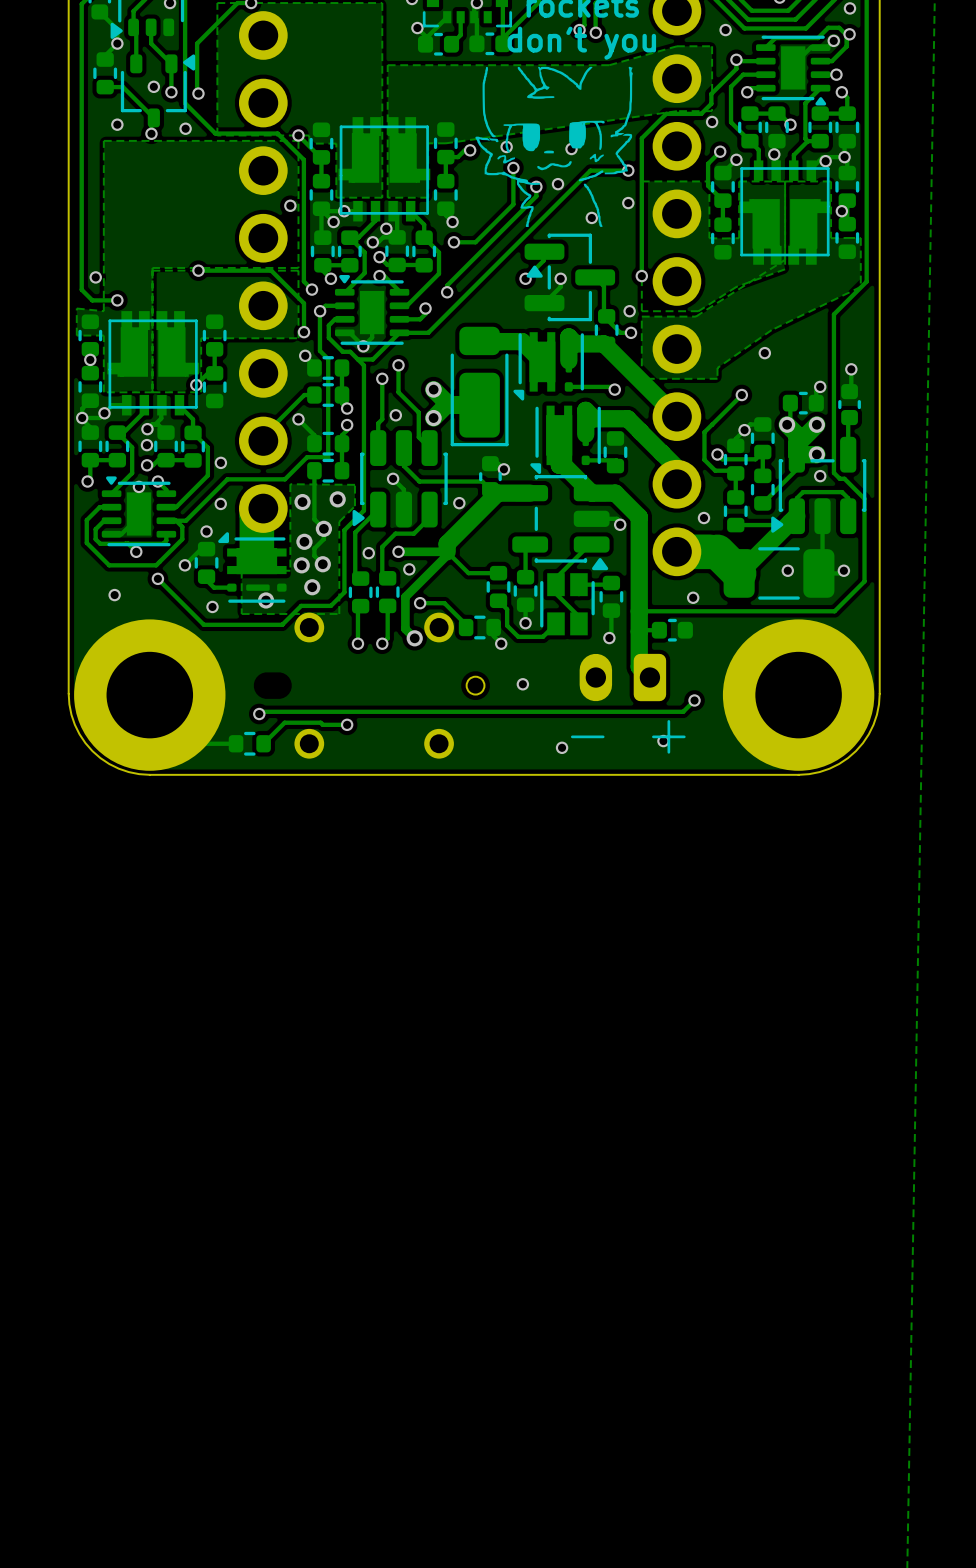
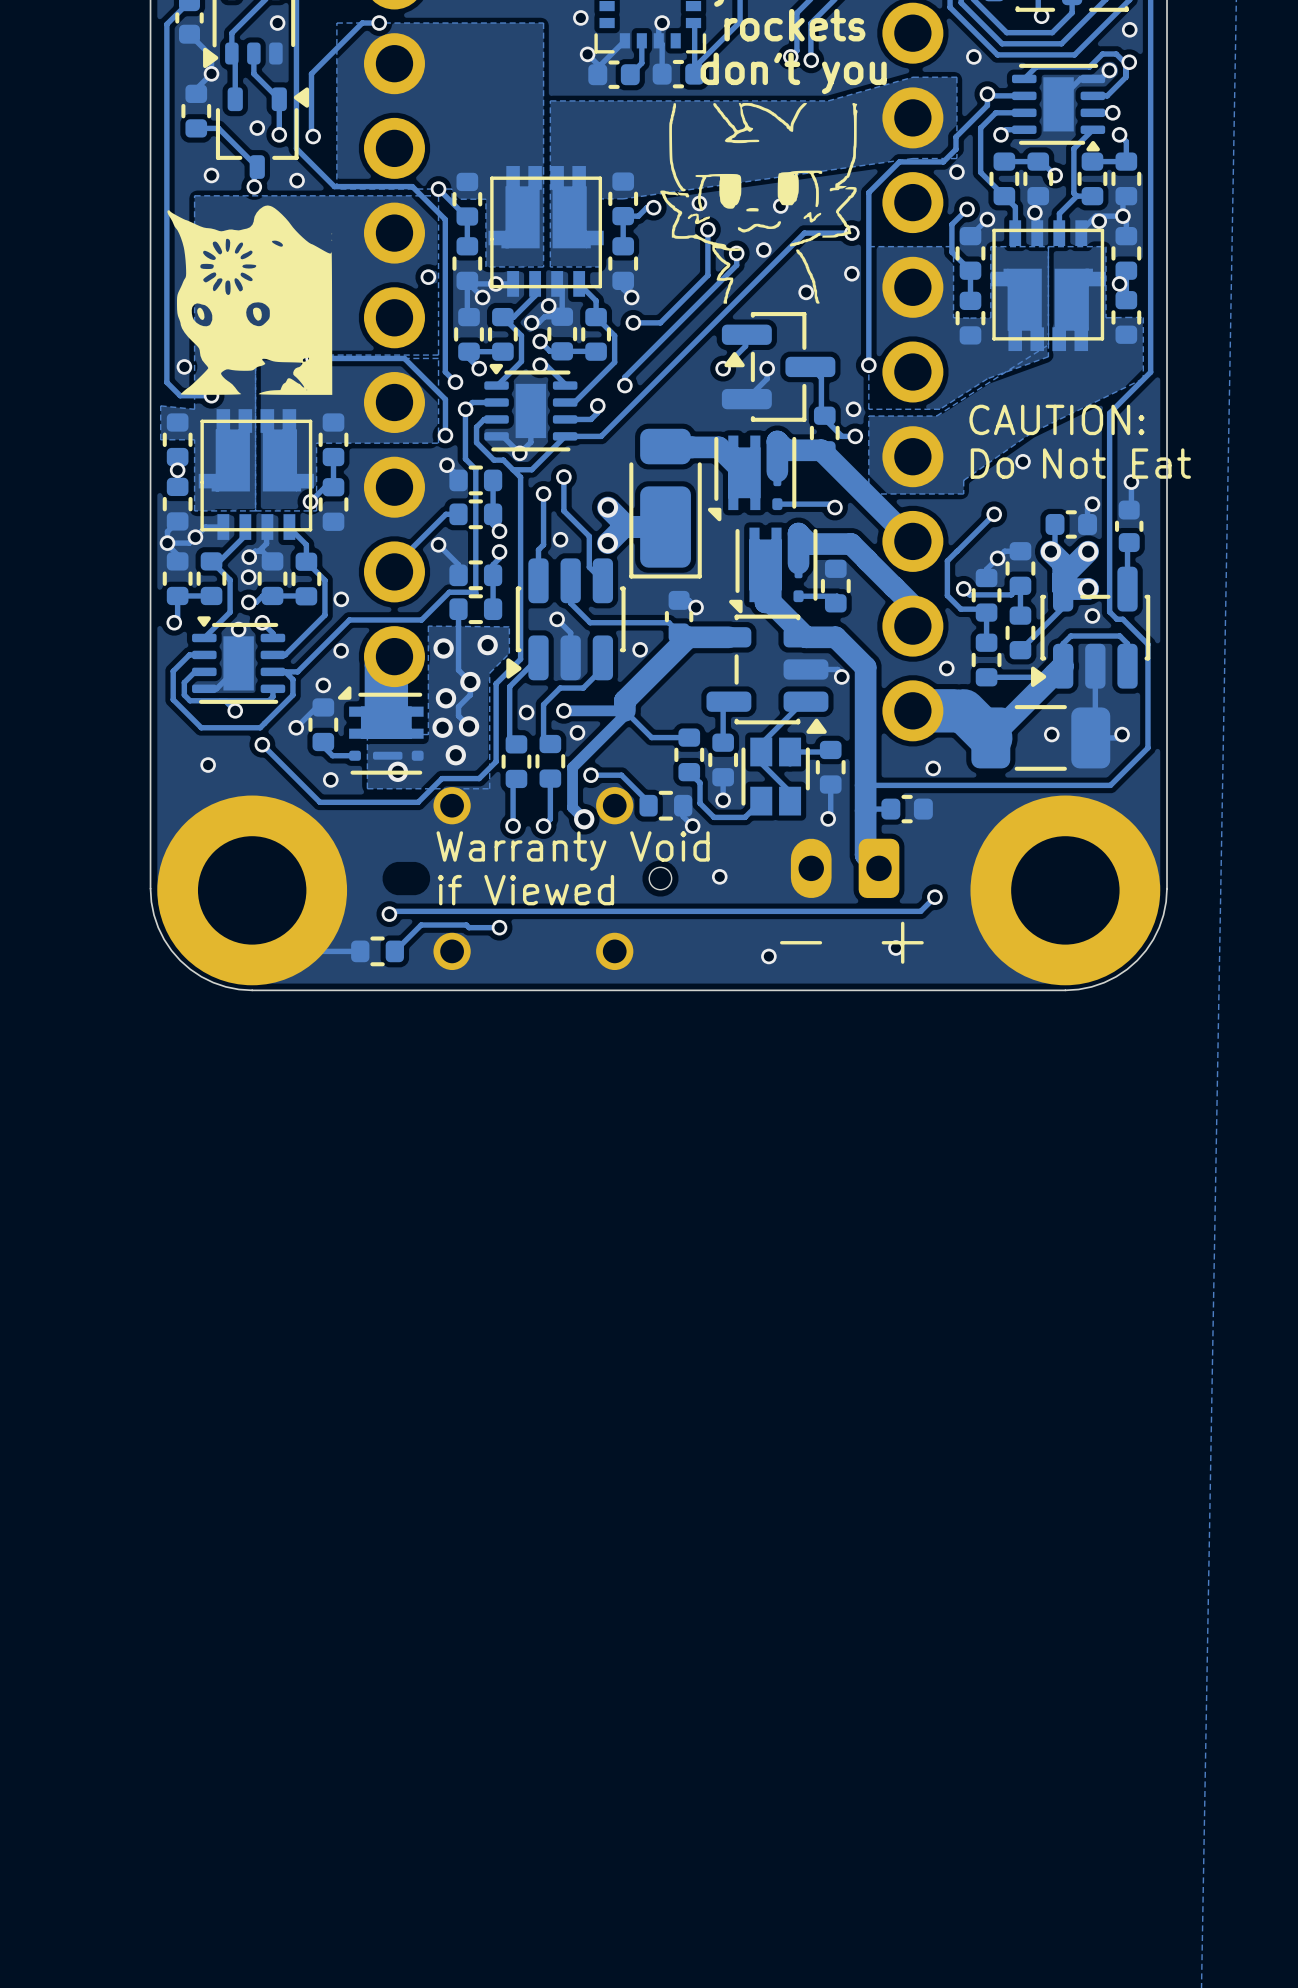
drawing: none -> [167, 205, 333, 395]
text: none -> CAUTION: (1056, 419)
text: none -> Do Not Eat (1080, 463)
text: none -> Warranty Void (573, 851)
text: none -> if Viewed (525, 890)

